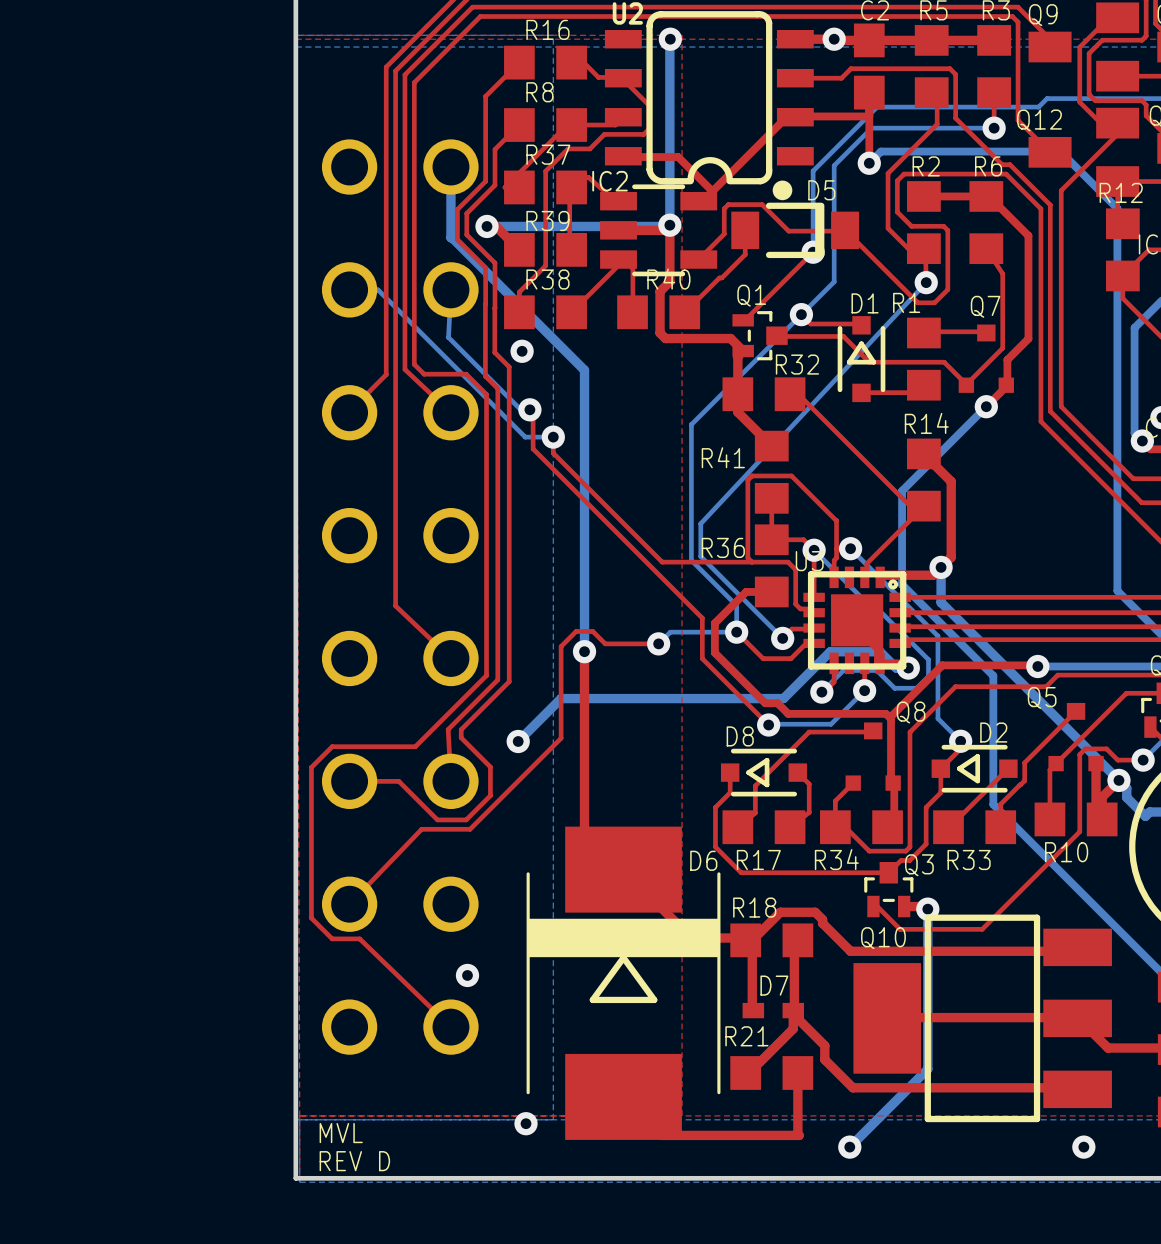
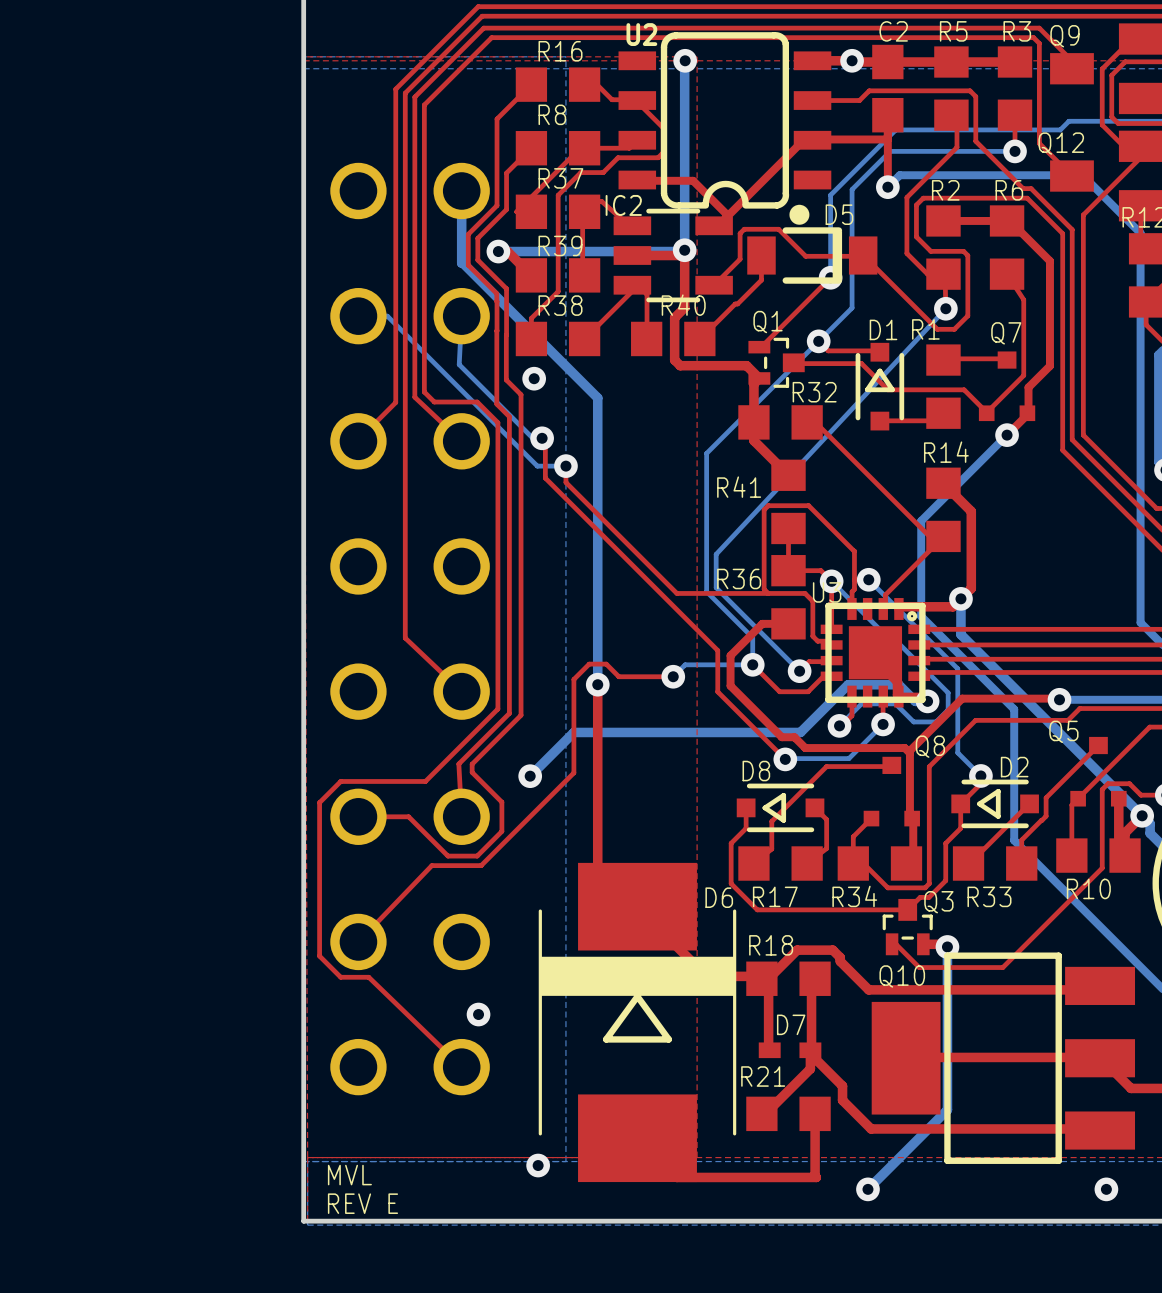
text: REV D (354, 1161) -> REV E (362, 1203)

